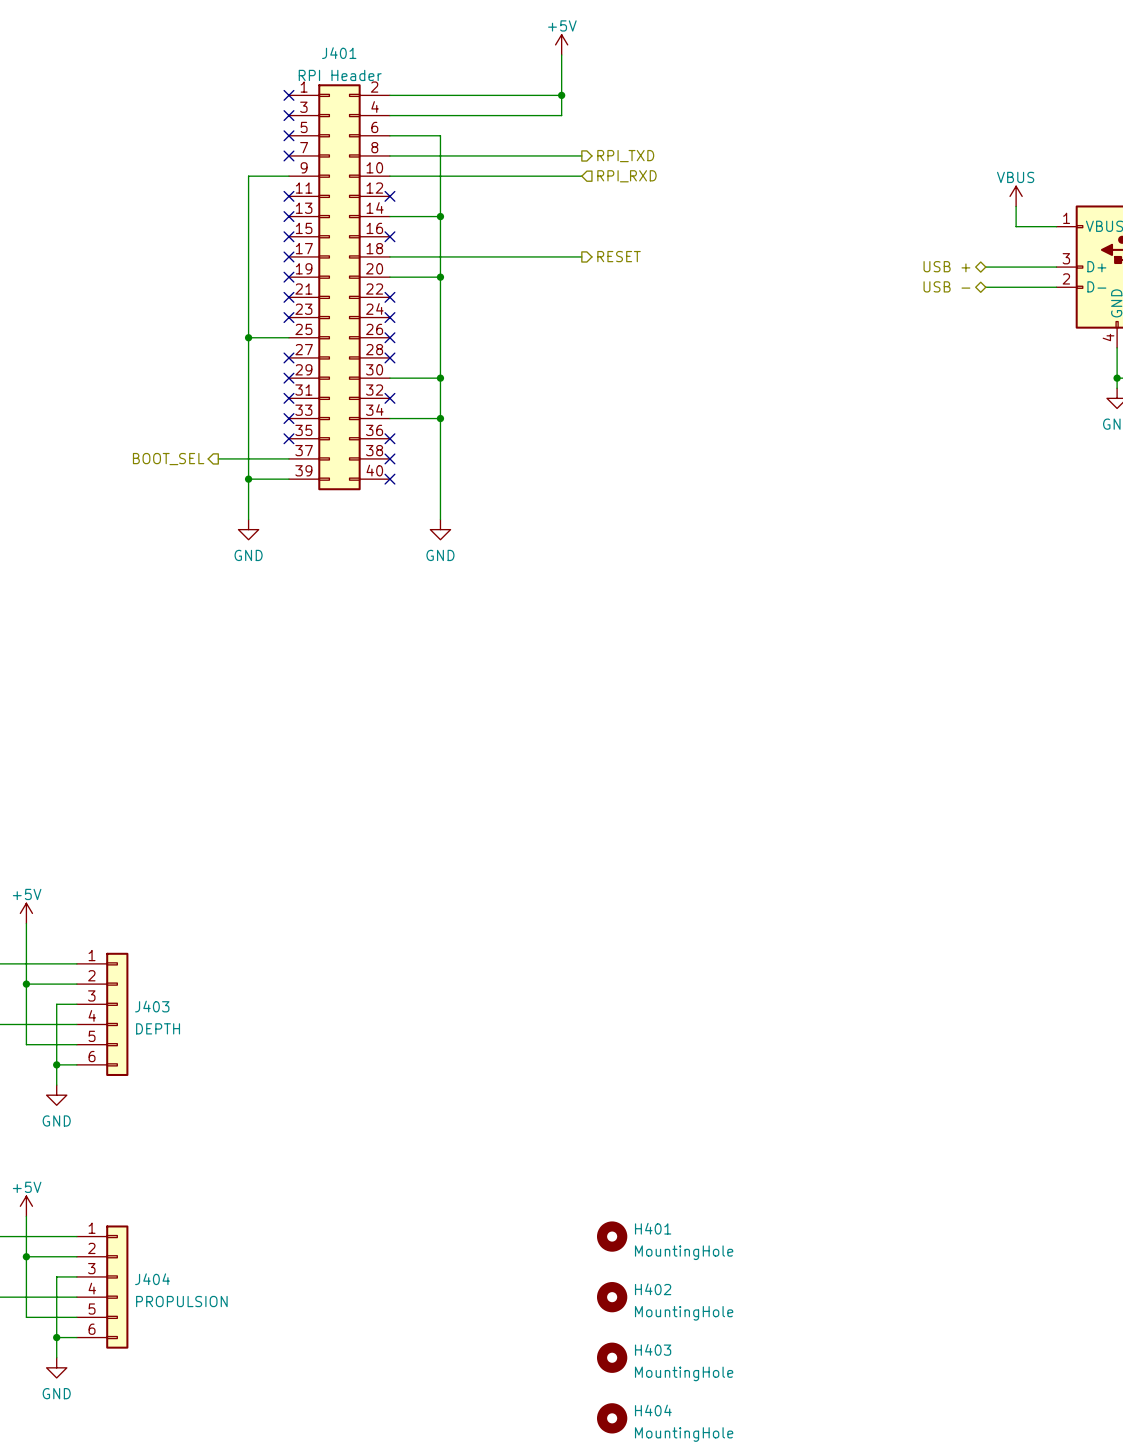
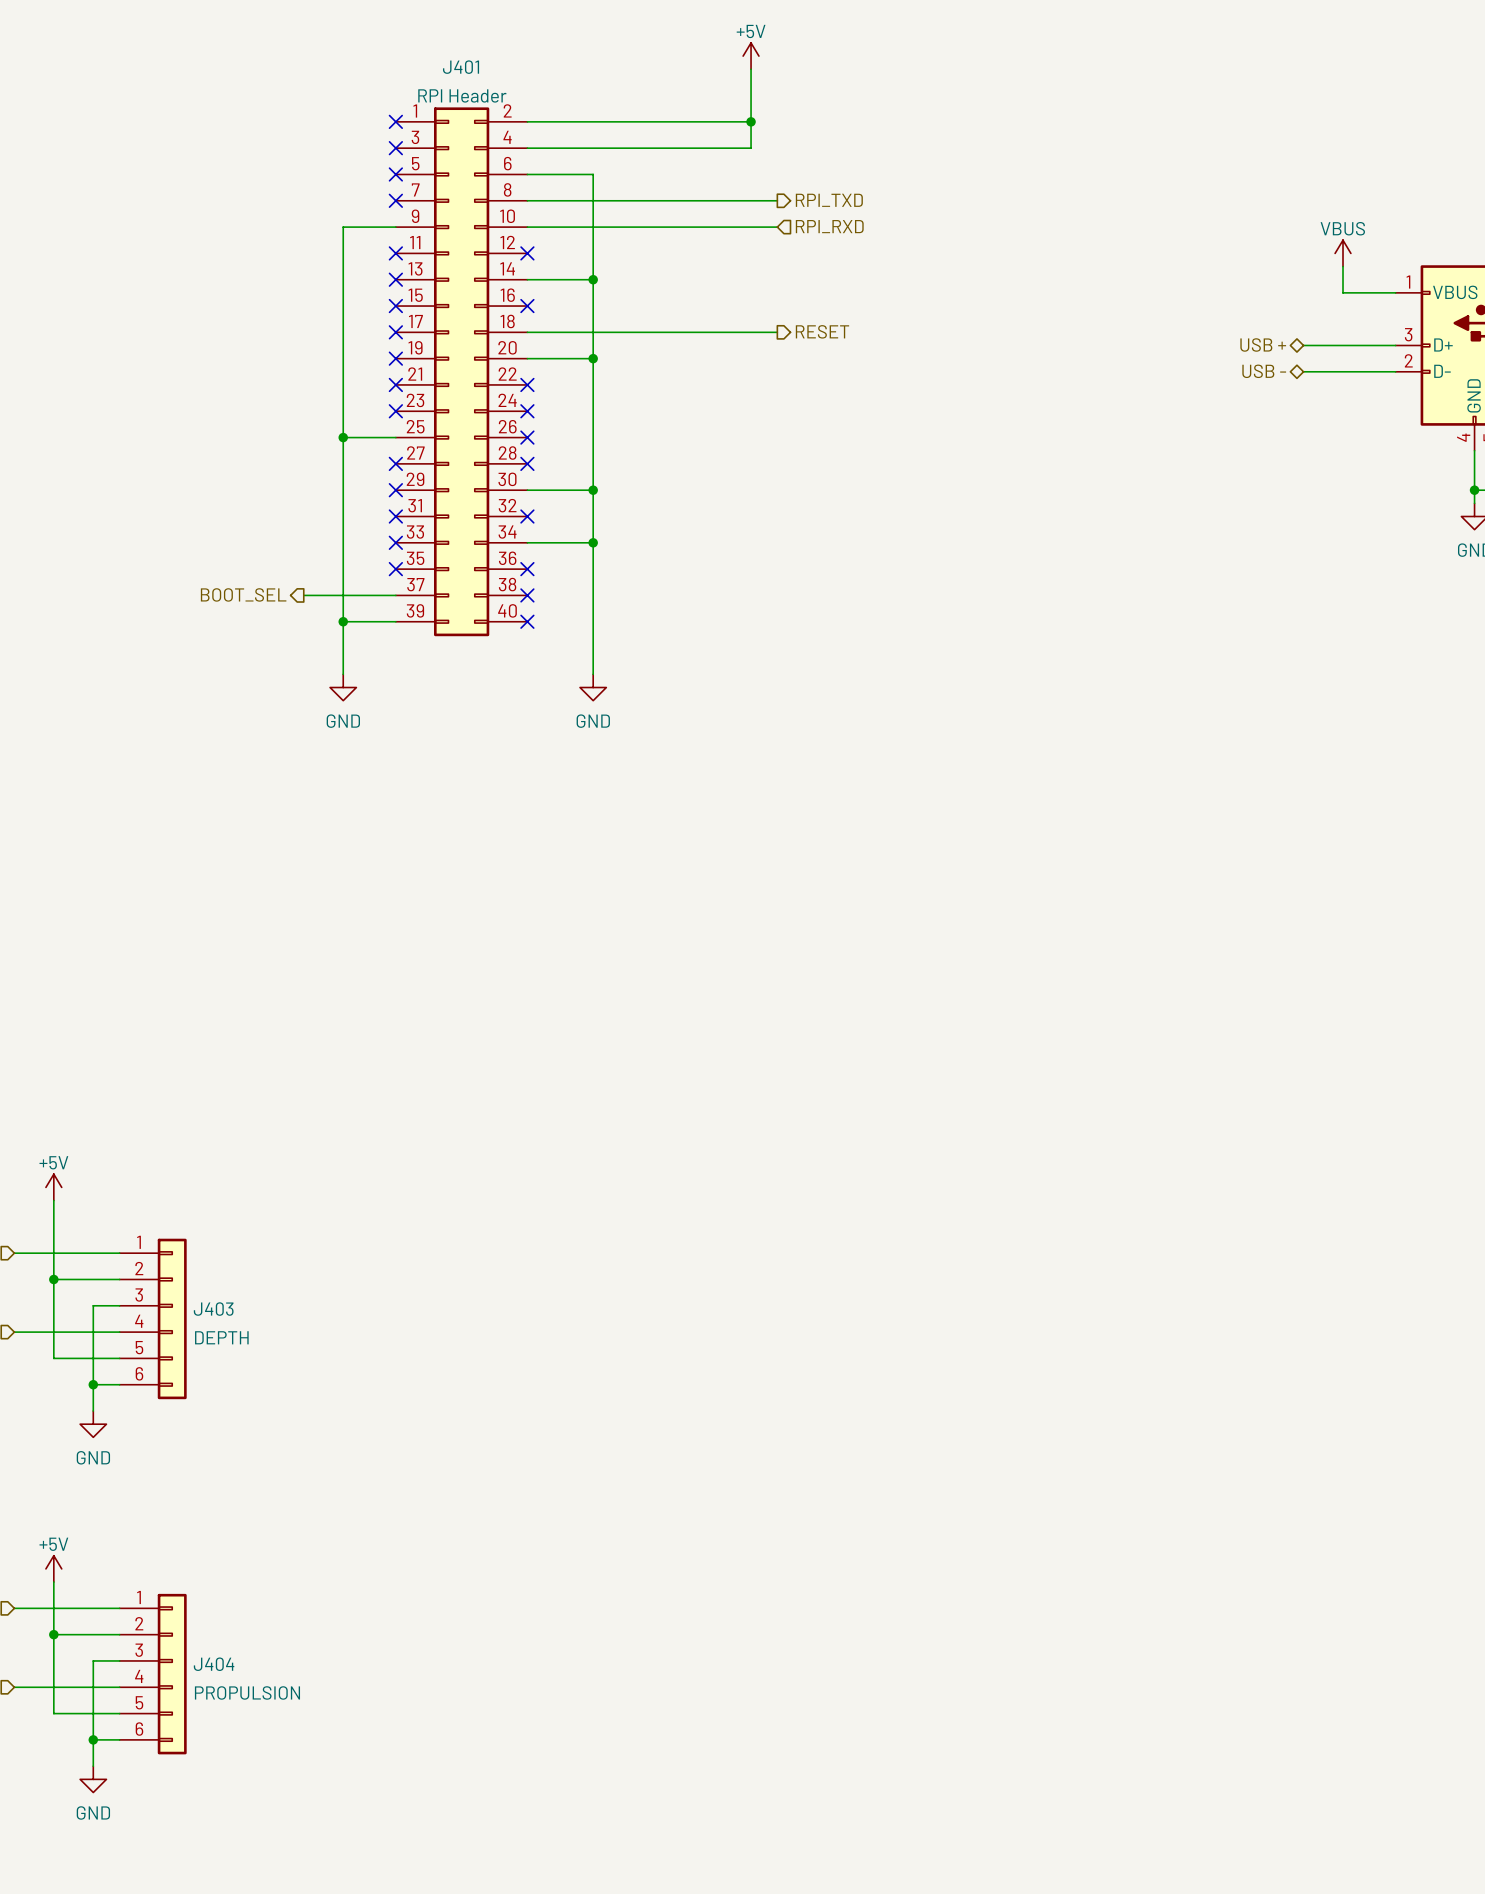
H401: MountingHole (612, 1236) -> none
H402: MountingHole (612, 1297) -> none
H403: MountingHole (612, 1357) -> none
H404: MountingHole (612, 1418) -> none

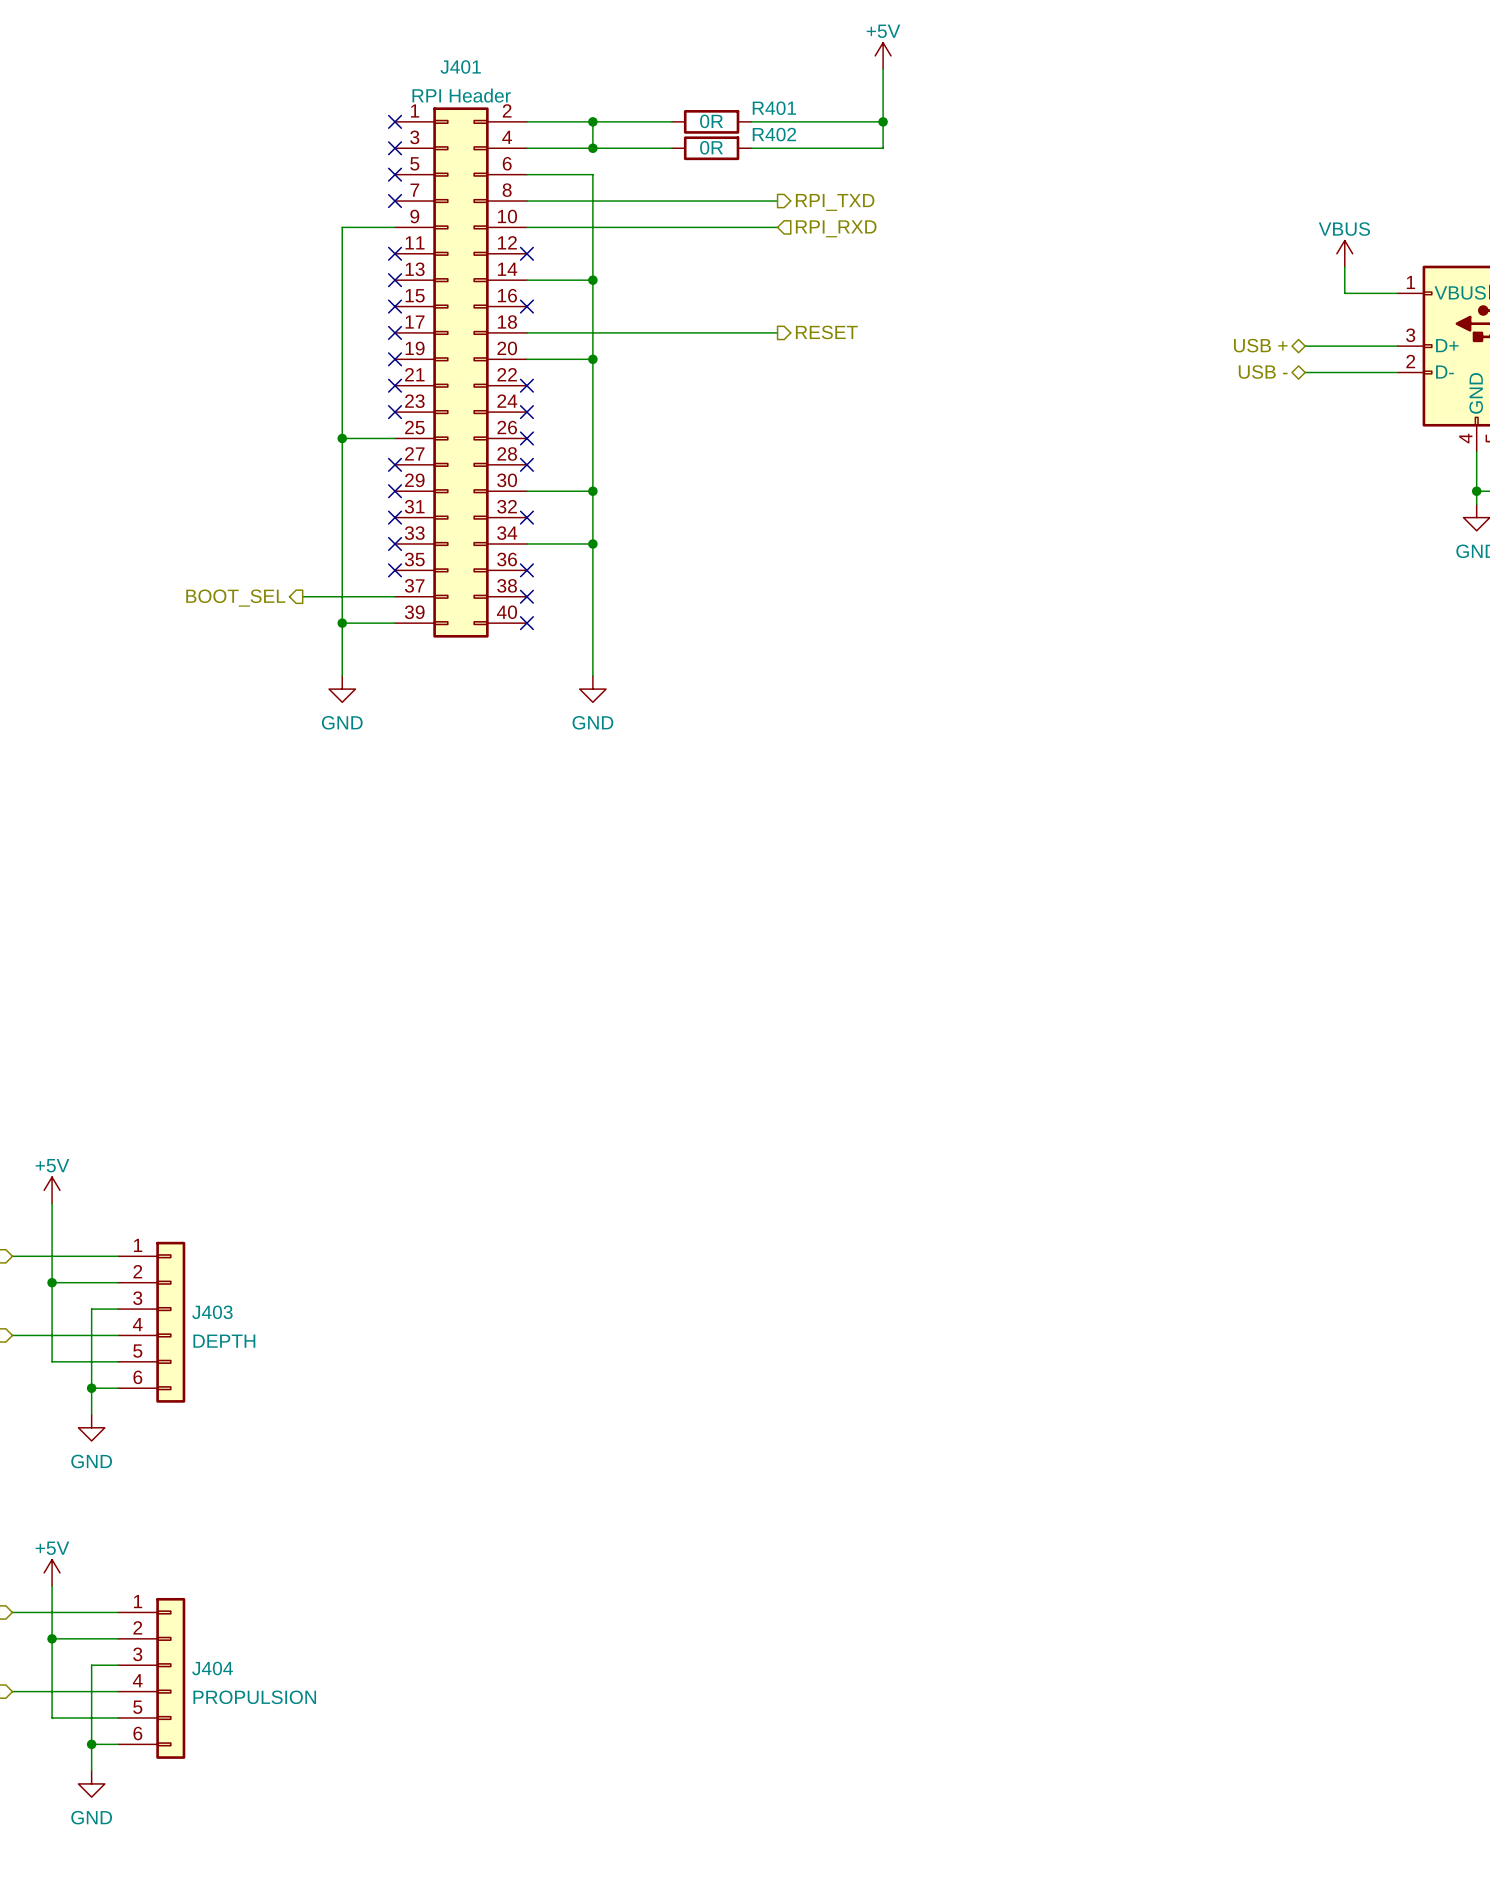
power symbol position: +5V (751, 56) -> +5V (883, 55)
wire: (751, 69) (751, 148) (672, 148) -> none
wire: none -> (883, 69) (883, 148) (751, 148)
wire: none -> (592, 121) (592, 148)
junction: none -> (592, 121)
wire: (672, 121) (751, 121) -> (883, 121) (751, 121)
R401: none -> 0R (711, 121)
junction: (751, 121) -> none
junction: none -> (883, 121)
junction: none -> (592, 148)
R402: none -> 0R (711, 148)

